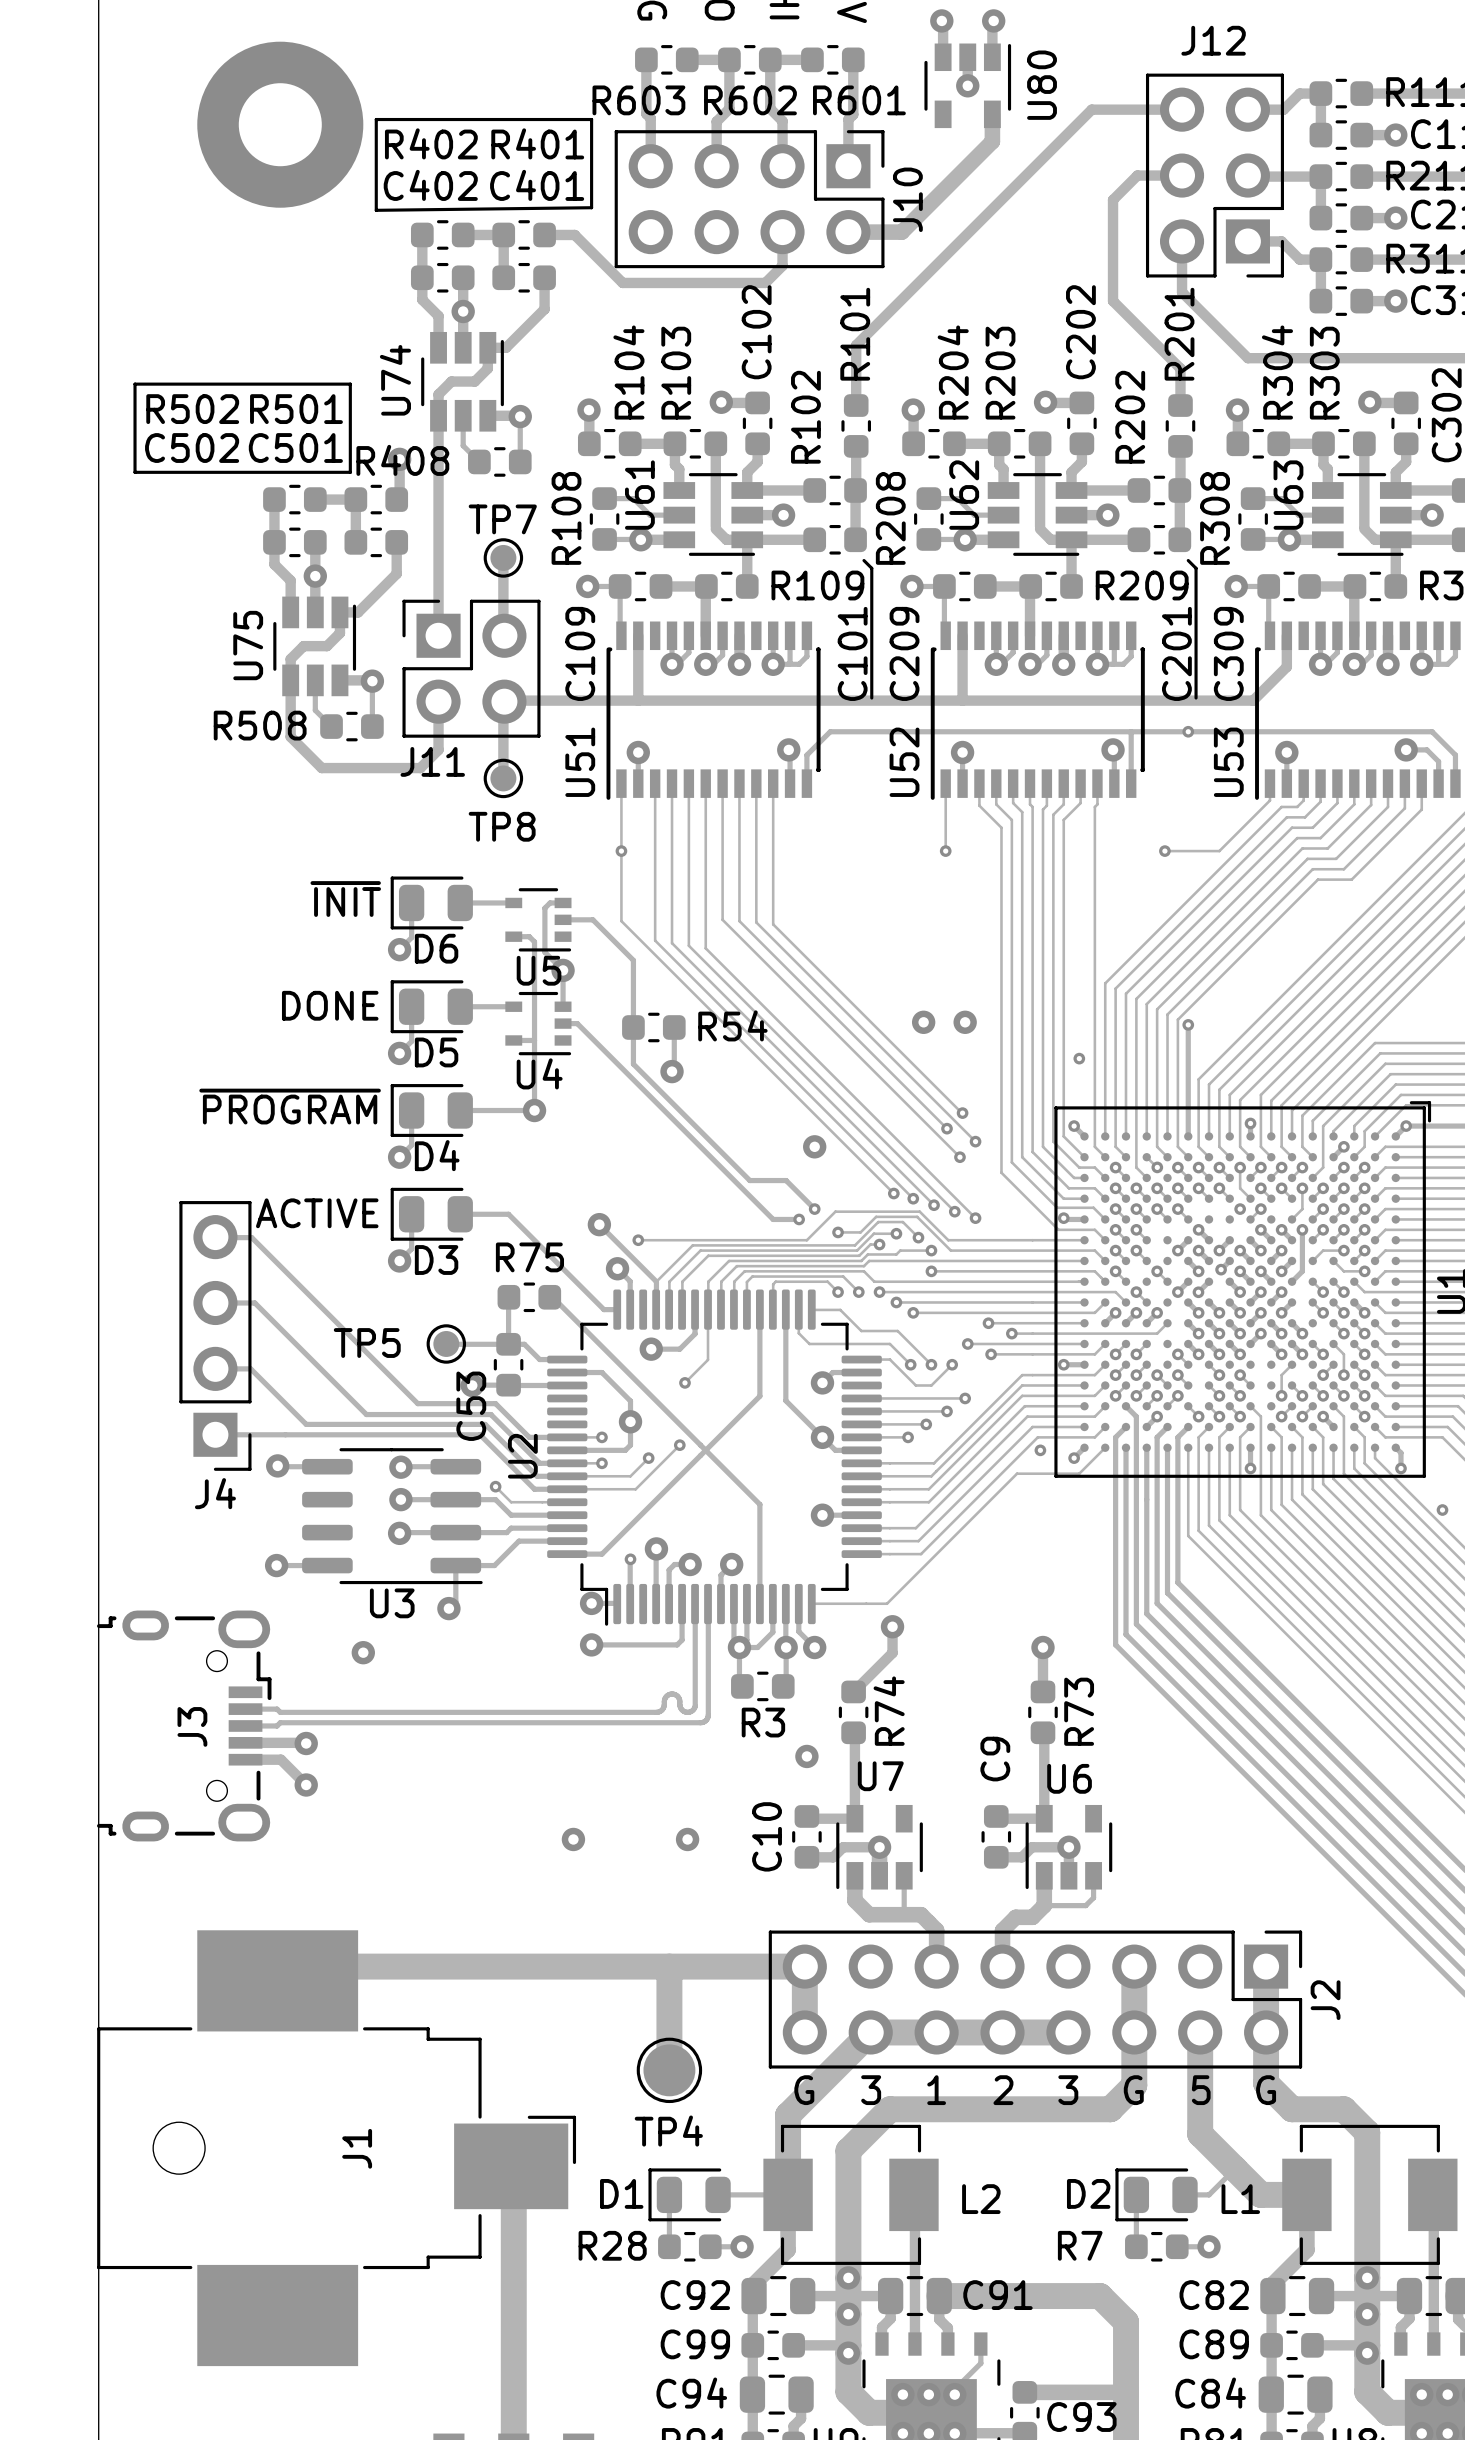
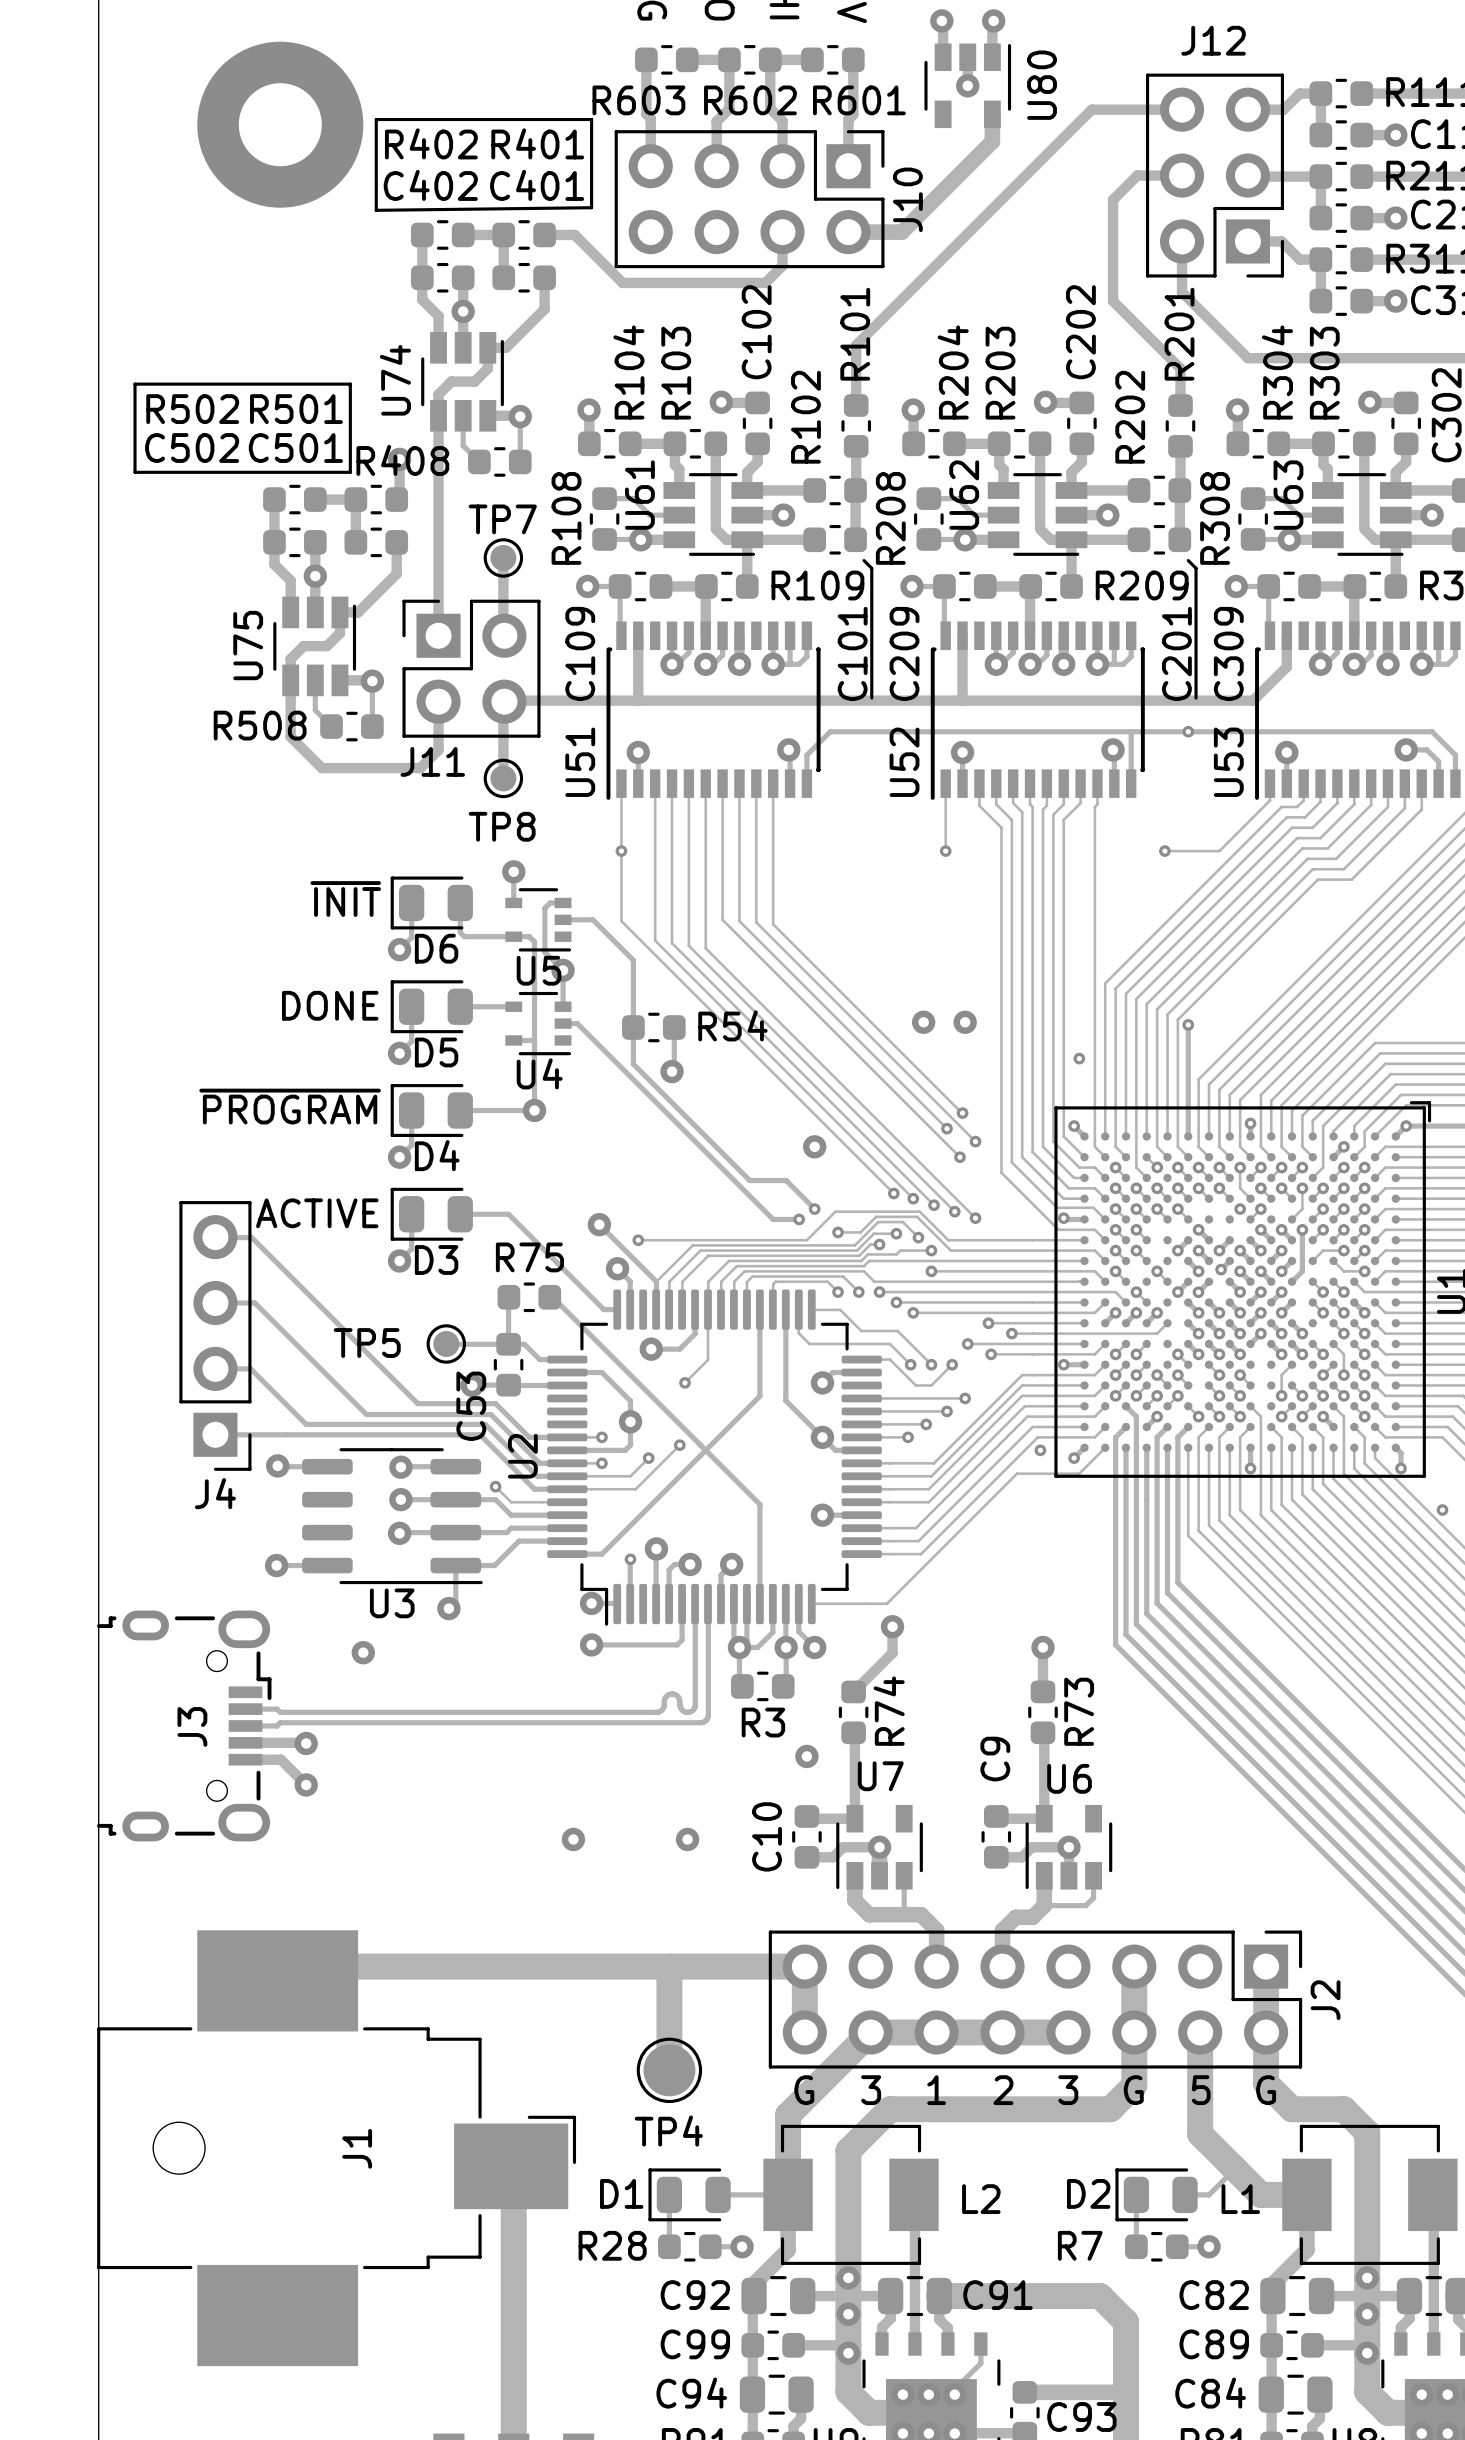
track: none -> (513, 871) (513, 902)
via: none -> (513, 871)
track: (460, 902) (513, 902) -> (460, 902) (460, 932) (464, 936) (513, 936)

